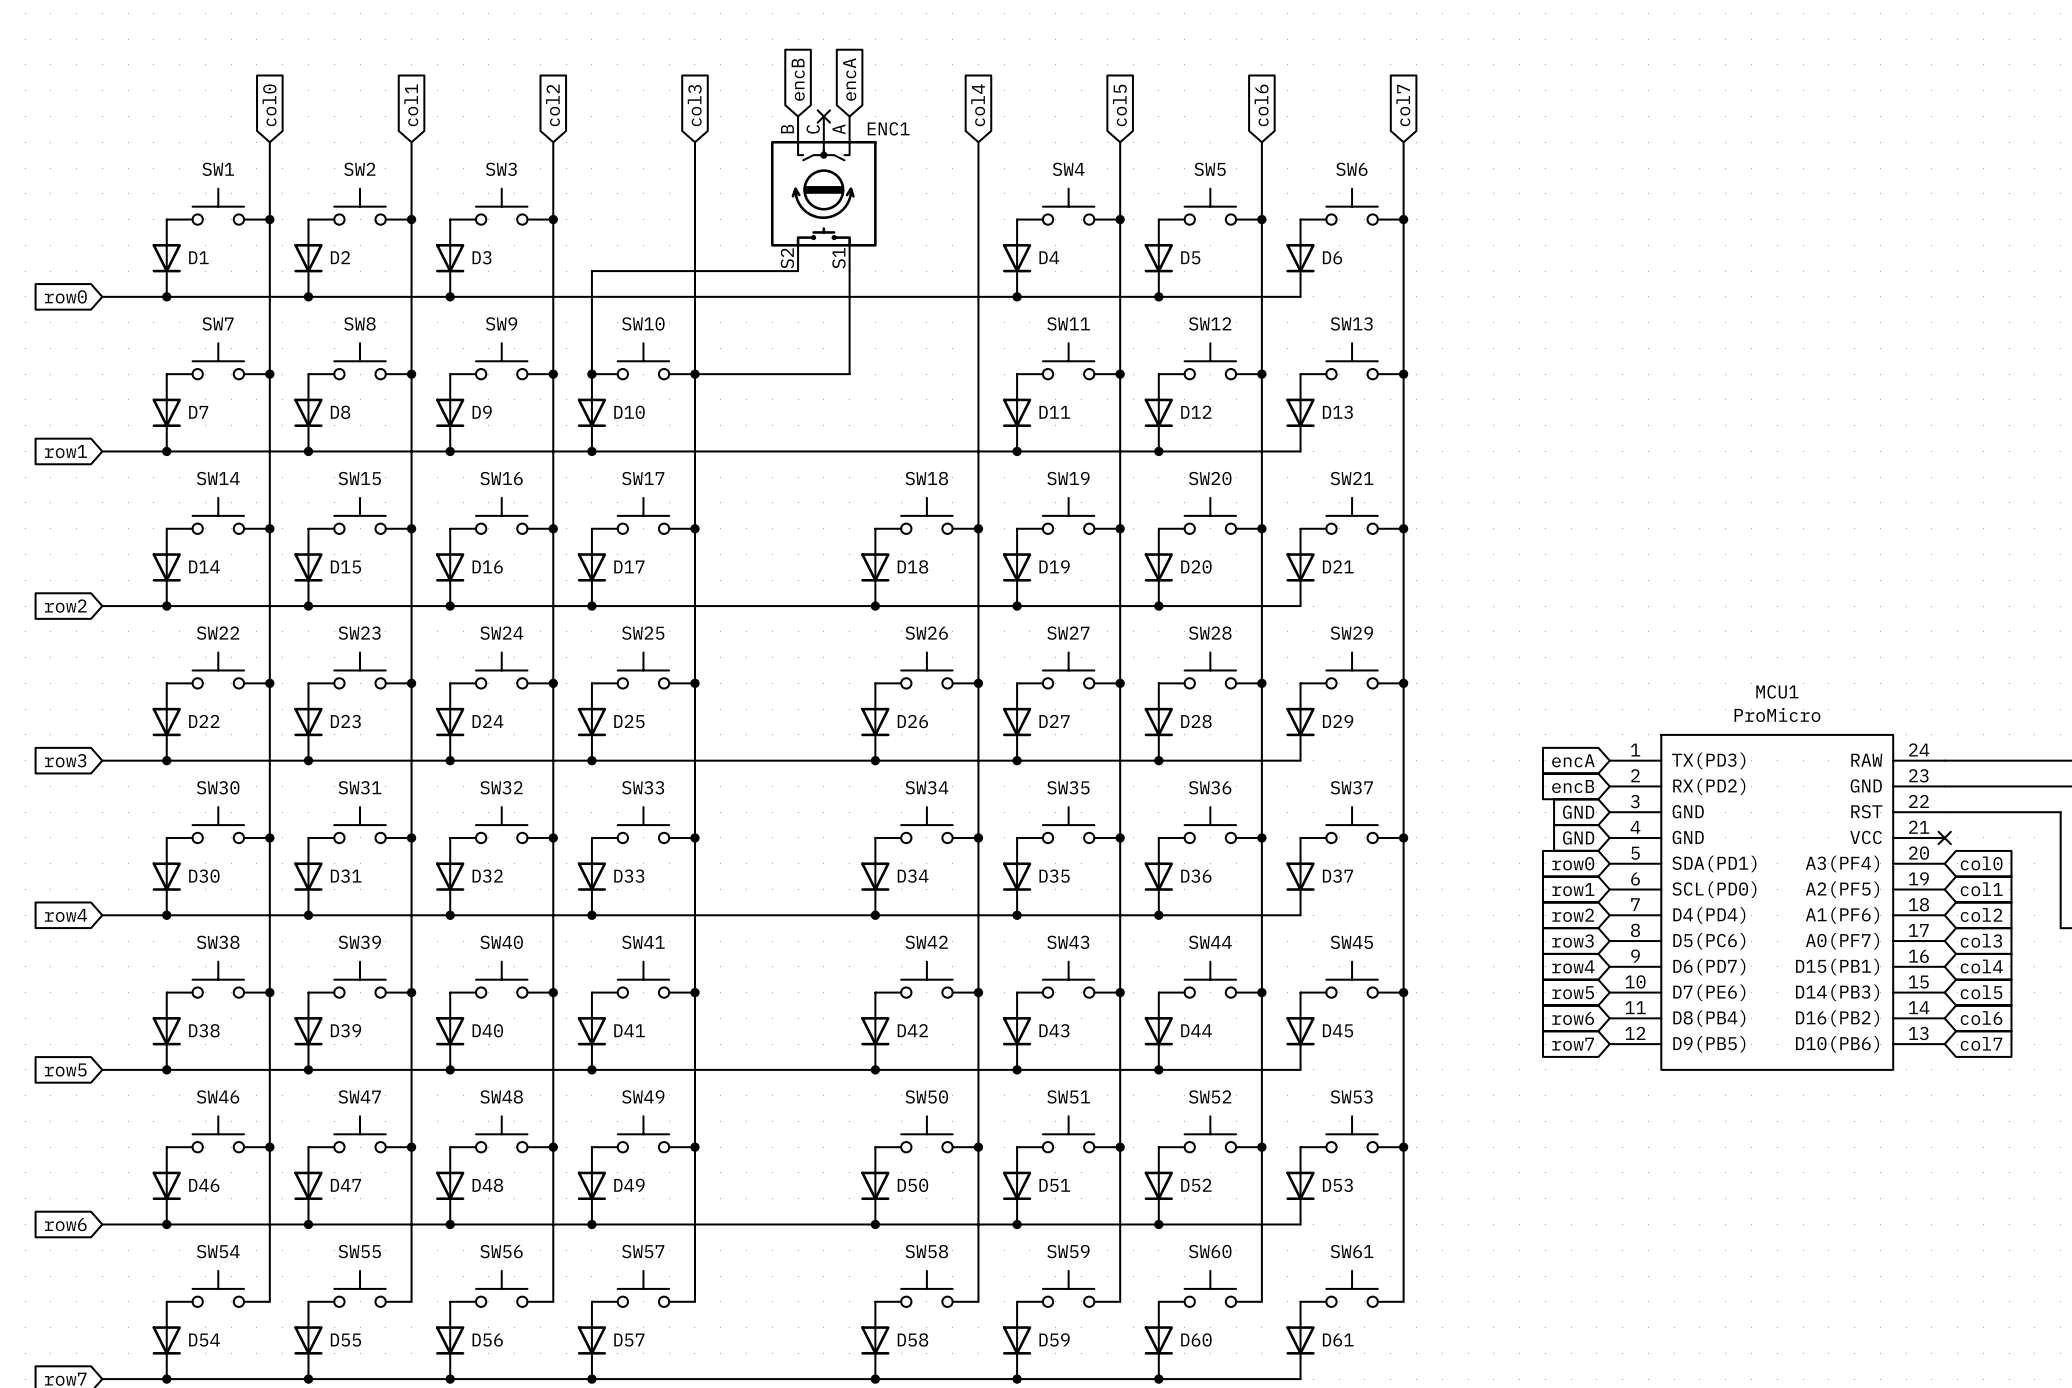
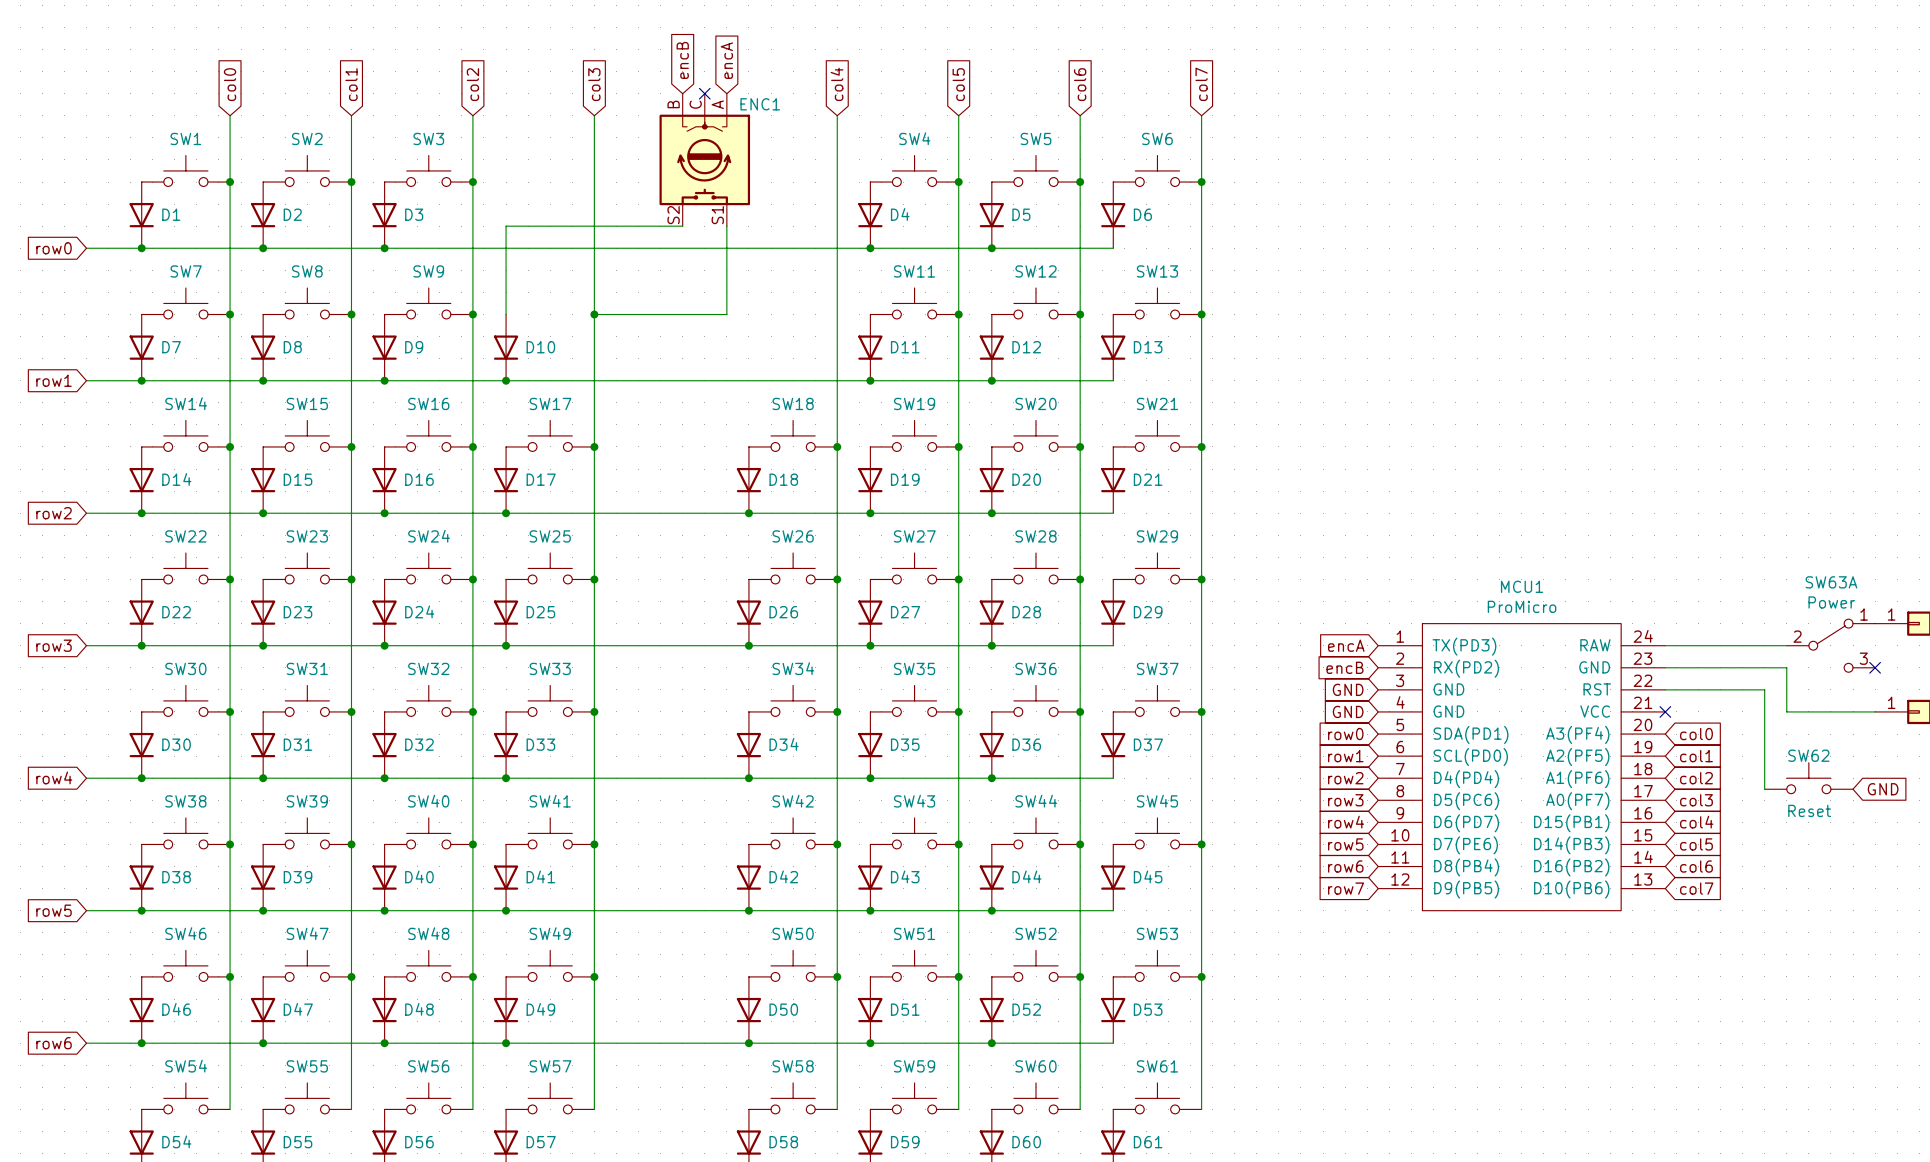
SW10: (643, 361) -> none
junction: (591, 374) -> none

